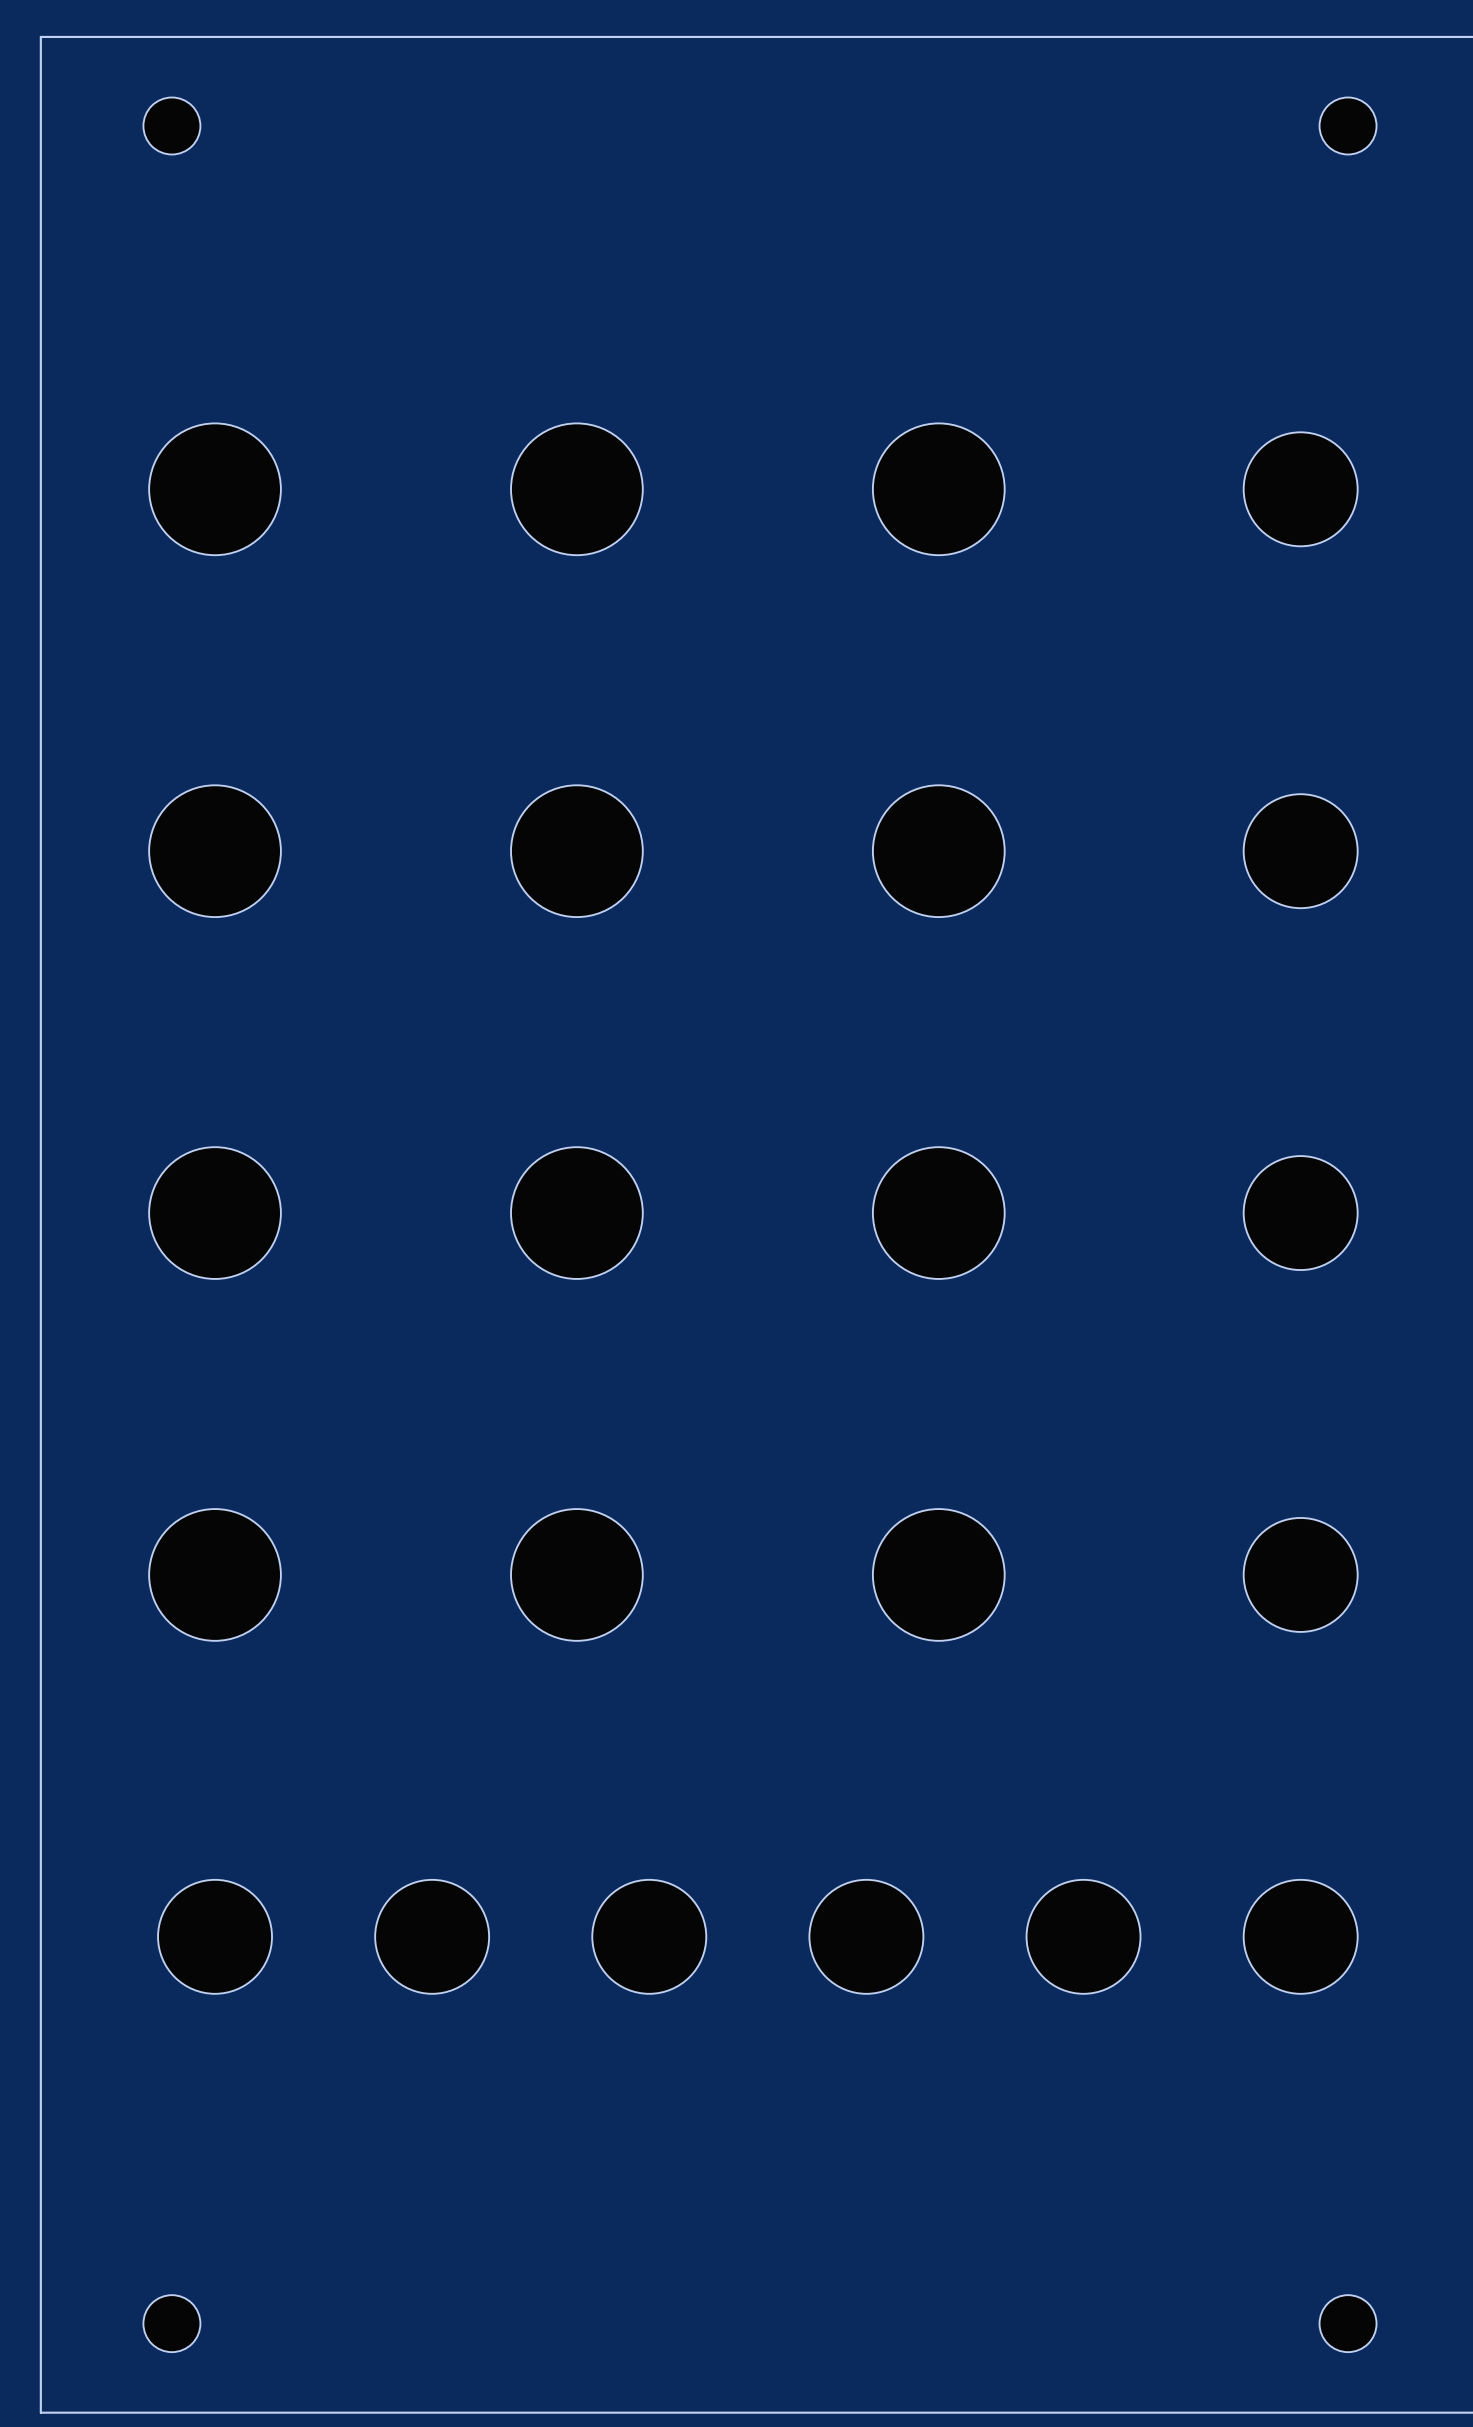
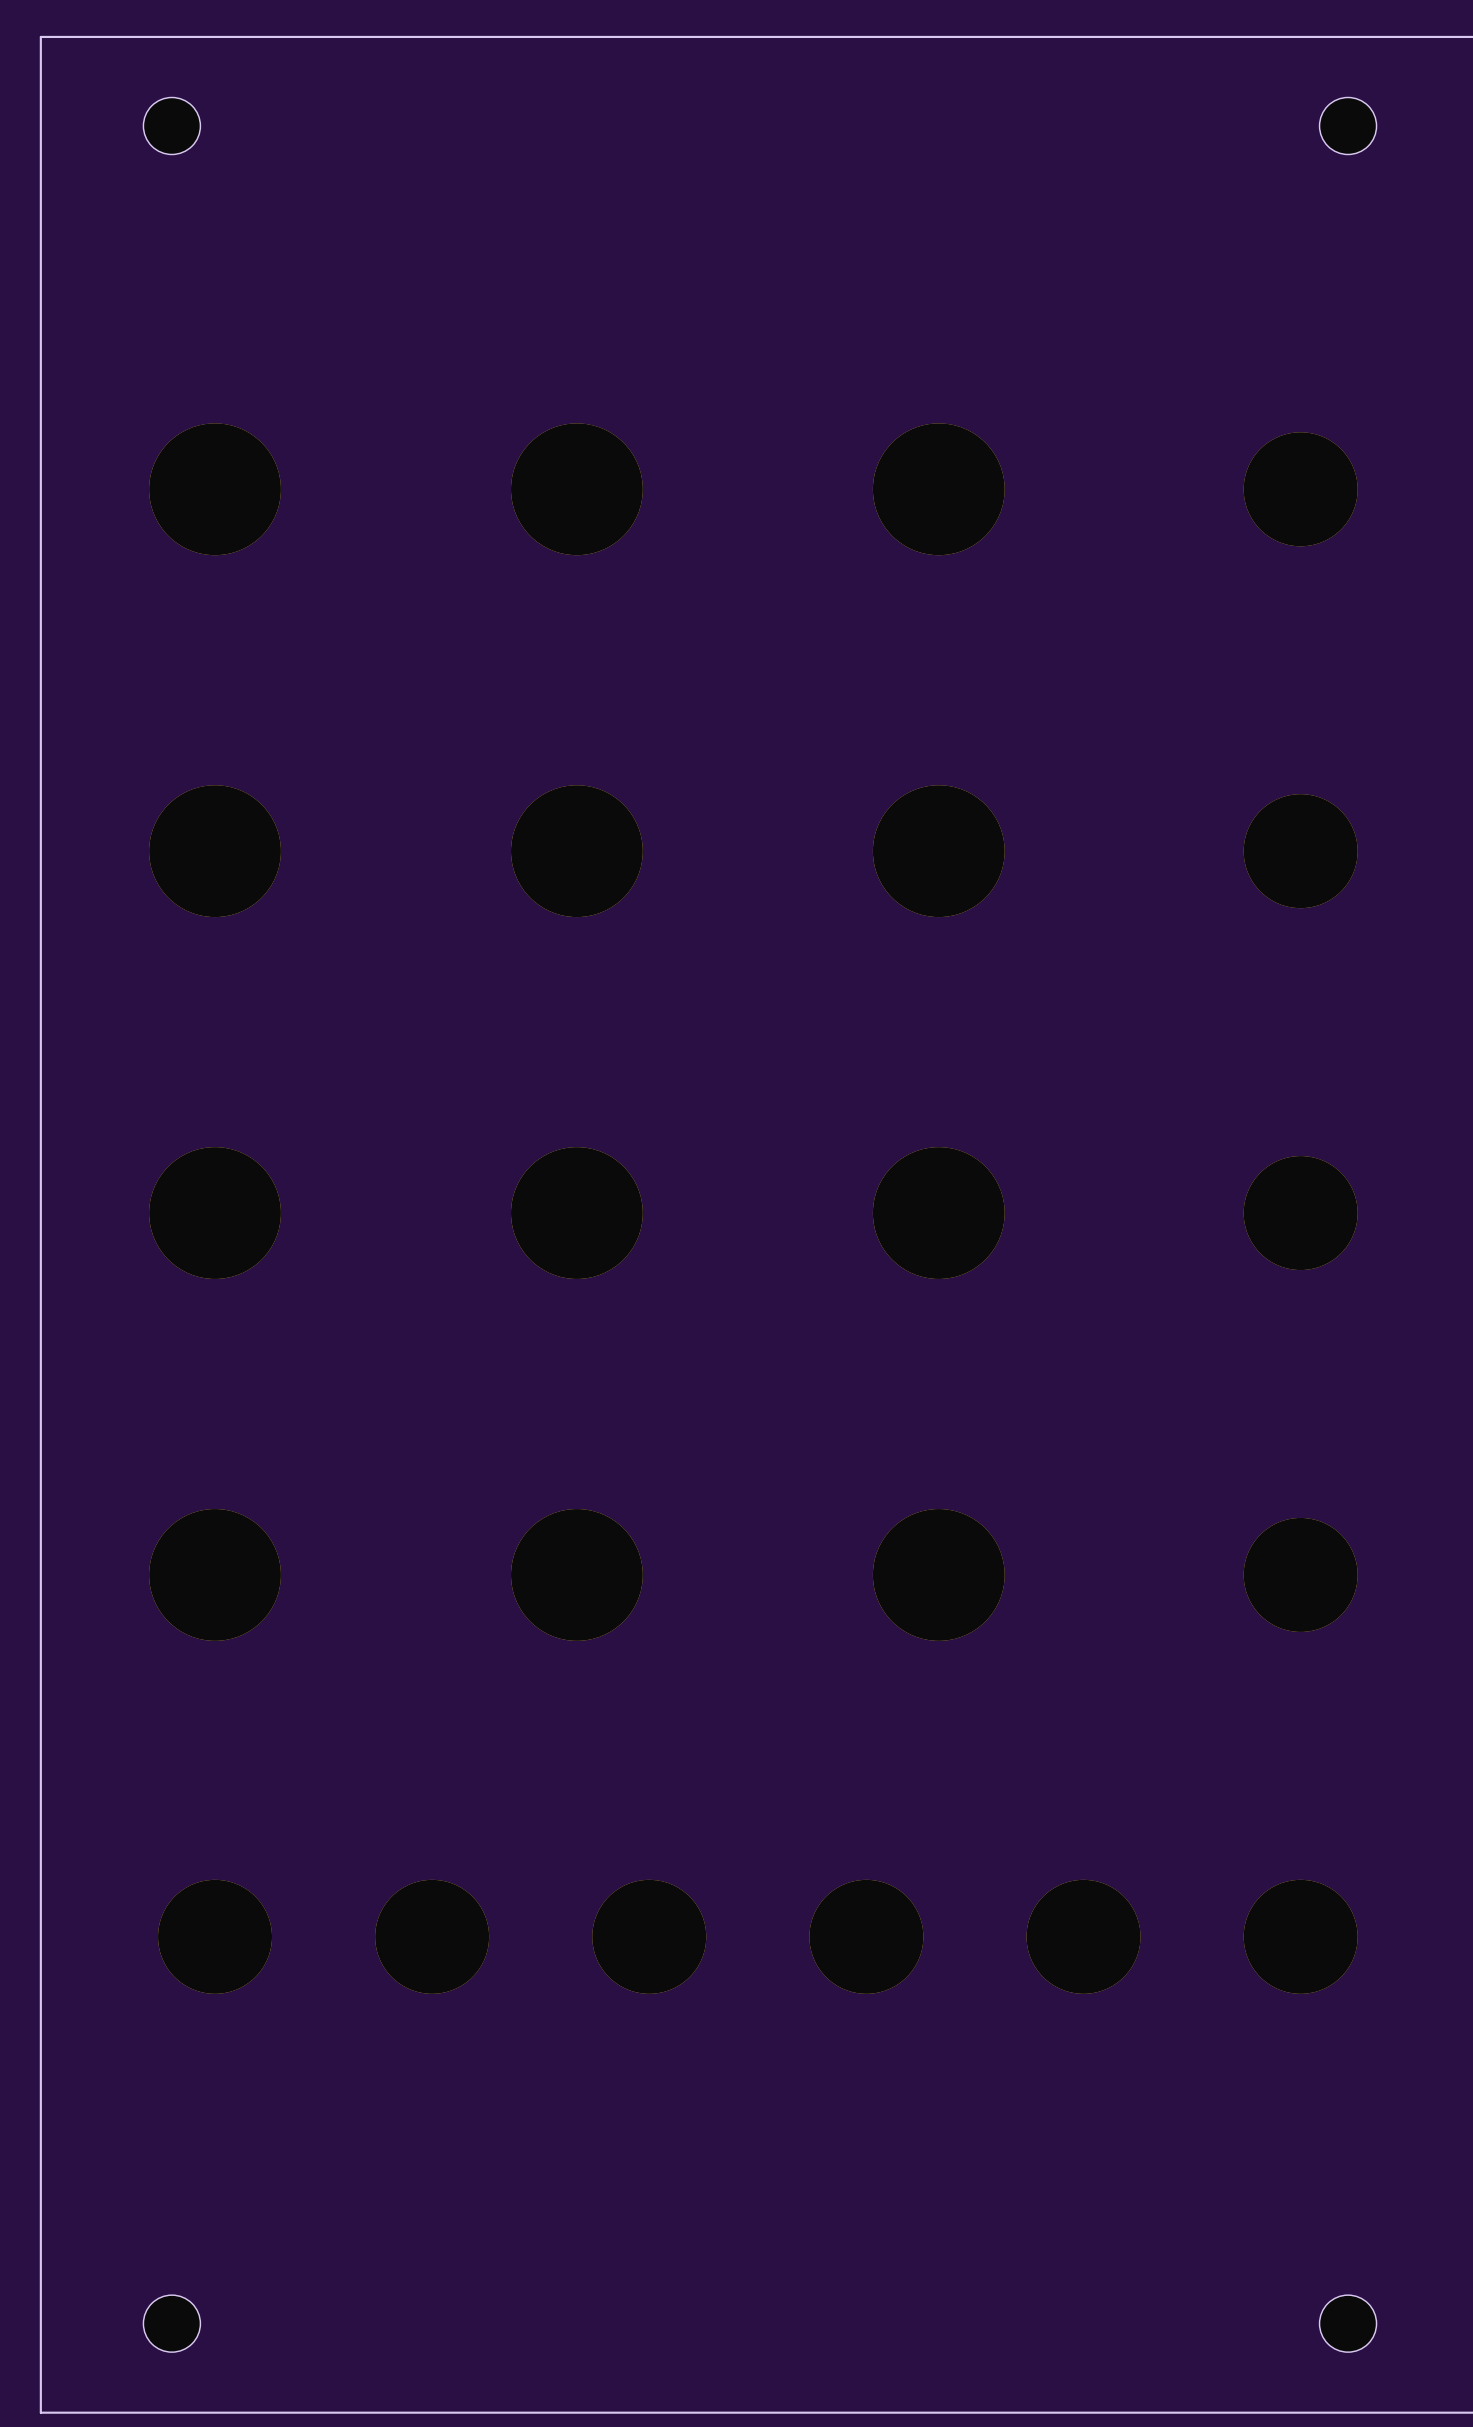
part footprint: [149, 423, 281, 556] -> [149, 423, 281, 556]
part footprint: [511, 423, 643, 556] -> [511, 423, 643, 556]
part footprint: [872, 423, 1005, 556] -> [872, 423, 1005, 556]
part footprint: [1243, 432, 1358, 547] -> [1243, 432, 1358, 547]
part footprint: [149, 785, 281, 918] -> [149, 785, 281, 918]
part footprint: [511, 785, 643, 918] -> [511, 785, 643, 918]
part footprint: [872, 785, 1005, 918] -> [872, 785, 1005, 918]
part footprint: [1243, 794, 1358, 909] -> [1243, 794, 1358, 909]
part footprint: [149, 1147, 281, 1279] -> [149, 1147, 281, 1279]
part footprint: [511, 1147, 643, 1279] -> [511, 1147, 643, 1279]
part footprint: [872, 1147, 1005, 1279] -> [872, 1147, 1005, 1279]
part footprint: [1243, 1156, 1358, 1271] -> [1243, 1156, 1358, 1271]
part footprint: [149, 1509, 281, 1641] -> [149, 1509, 281, 1641]
part footprint: [511, 1509, 643, 1641] -> [511, 1509, 643, 1641]
part footprint: [872, 1509, 1005, 1641] -> [872, 1509, 1005, 1641]
part footprint: [1243, 1517, 1358, 1632] -> [1243, 1517, 1358, 1632]
part footprint: [158, 1879, 273, 1994] -> [158, 1879, 273, 1994]
part footprint: [375, 1879, 490, 1994] -> [375, 1879, 490, 1994]
part footprint: [592, 1879, 707, 1994] -> [592, 1879, 707, 1994]
part footprint: [809, 1879, 924, 1994] -> [809, 1879, 924, 1994]
part footprint: [1026, 1879, 1141, 1994] -> [1026, 1879, 1141, 1994]
part footprint: [1243, 1879, 1358, 1994] -> [1243, 1879, 1358, 1994]

